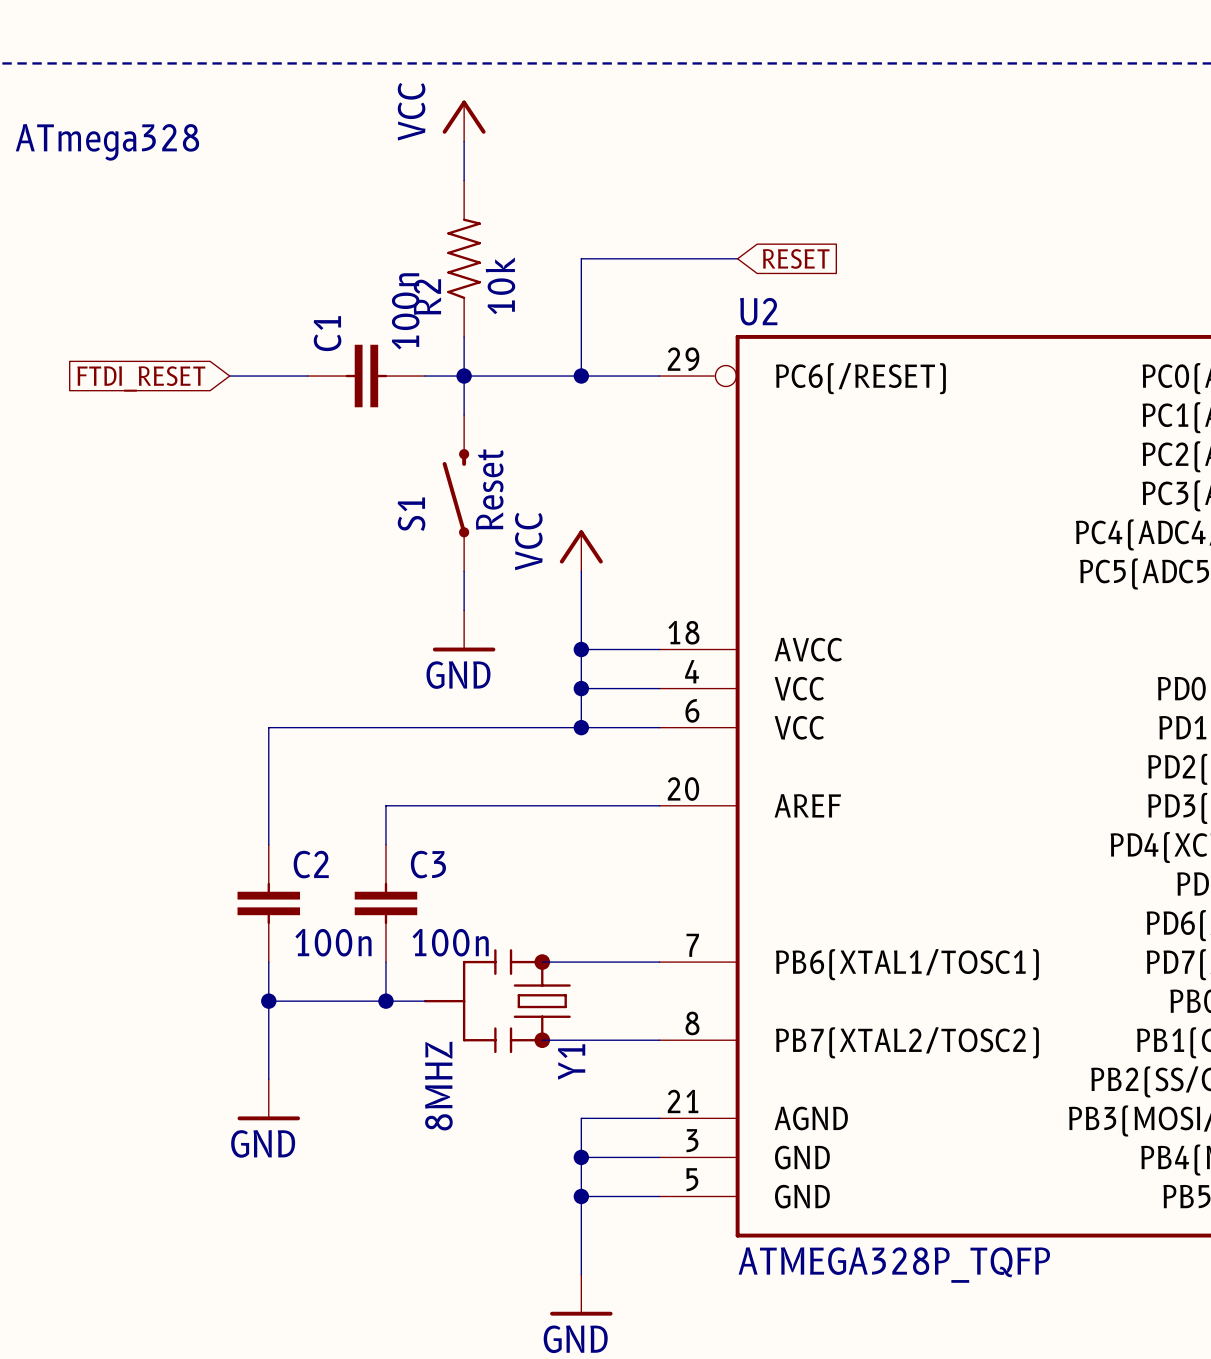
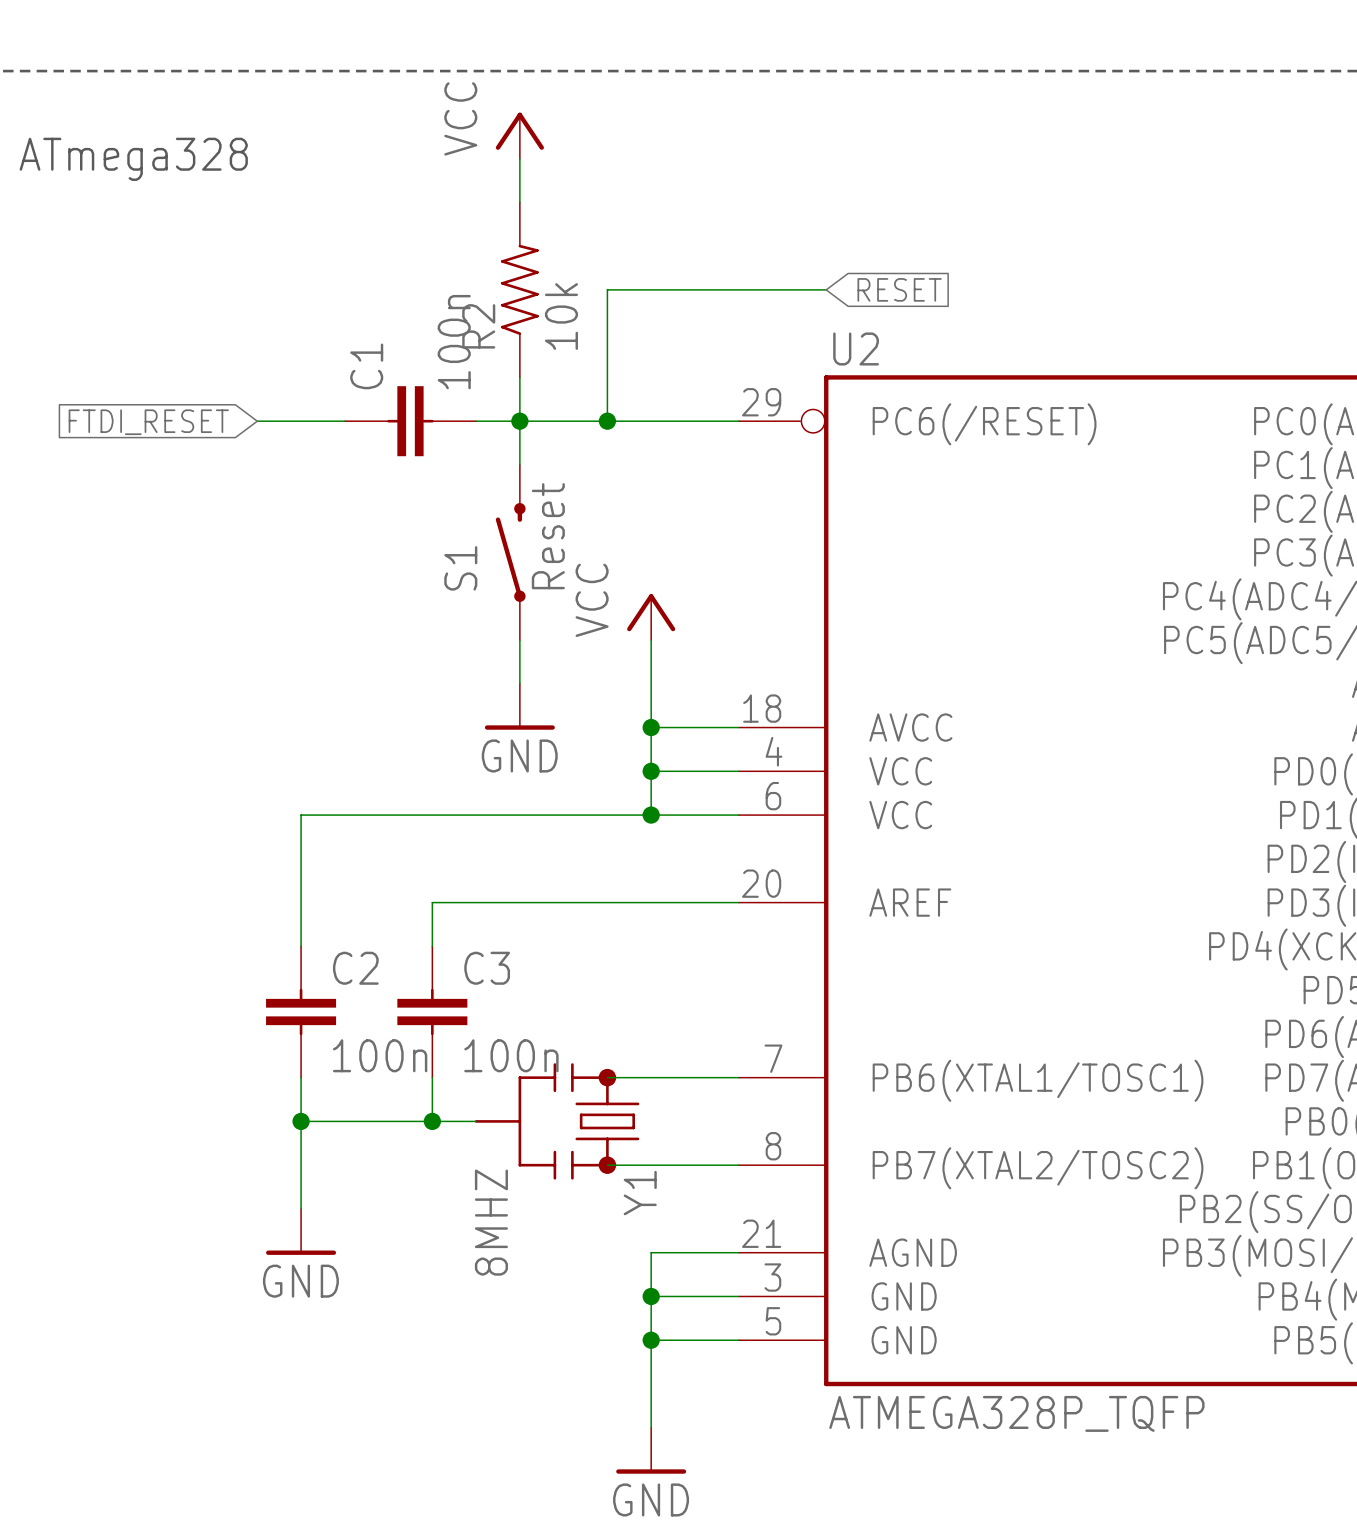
wire: (581, 258) (581, 376) -> (651, 289) (607, 289) (607, 421)
junction position: (581, 376) -> (607, 421)

